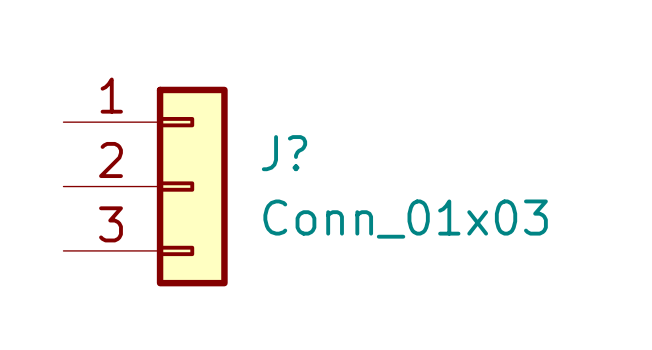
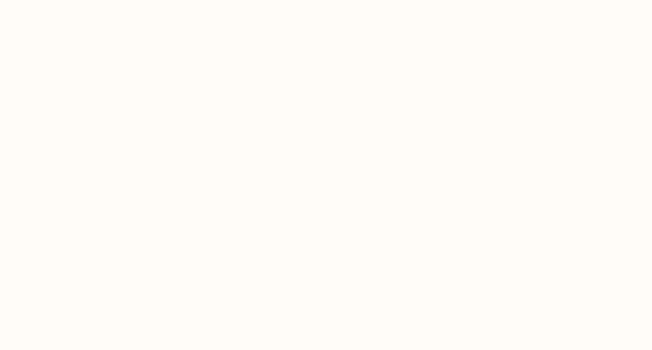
J?: Conn_01x03 (145, 186) -> none

